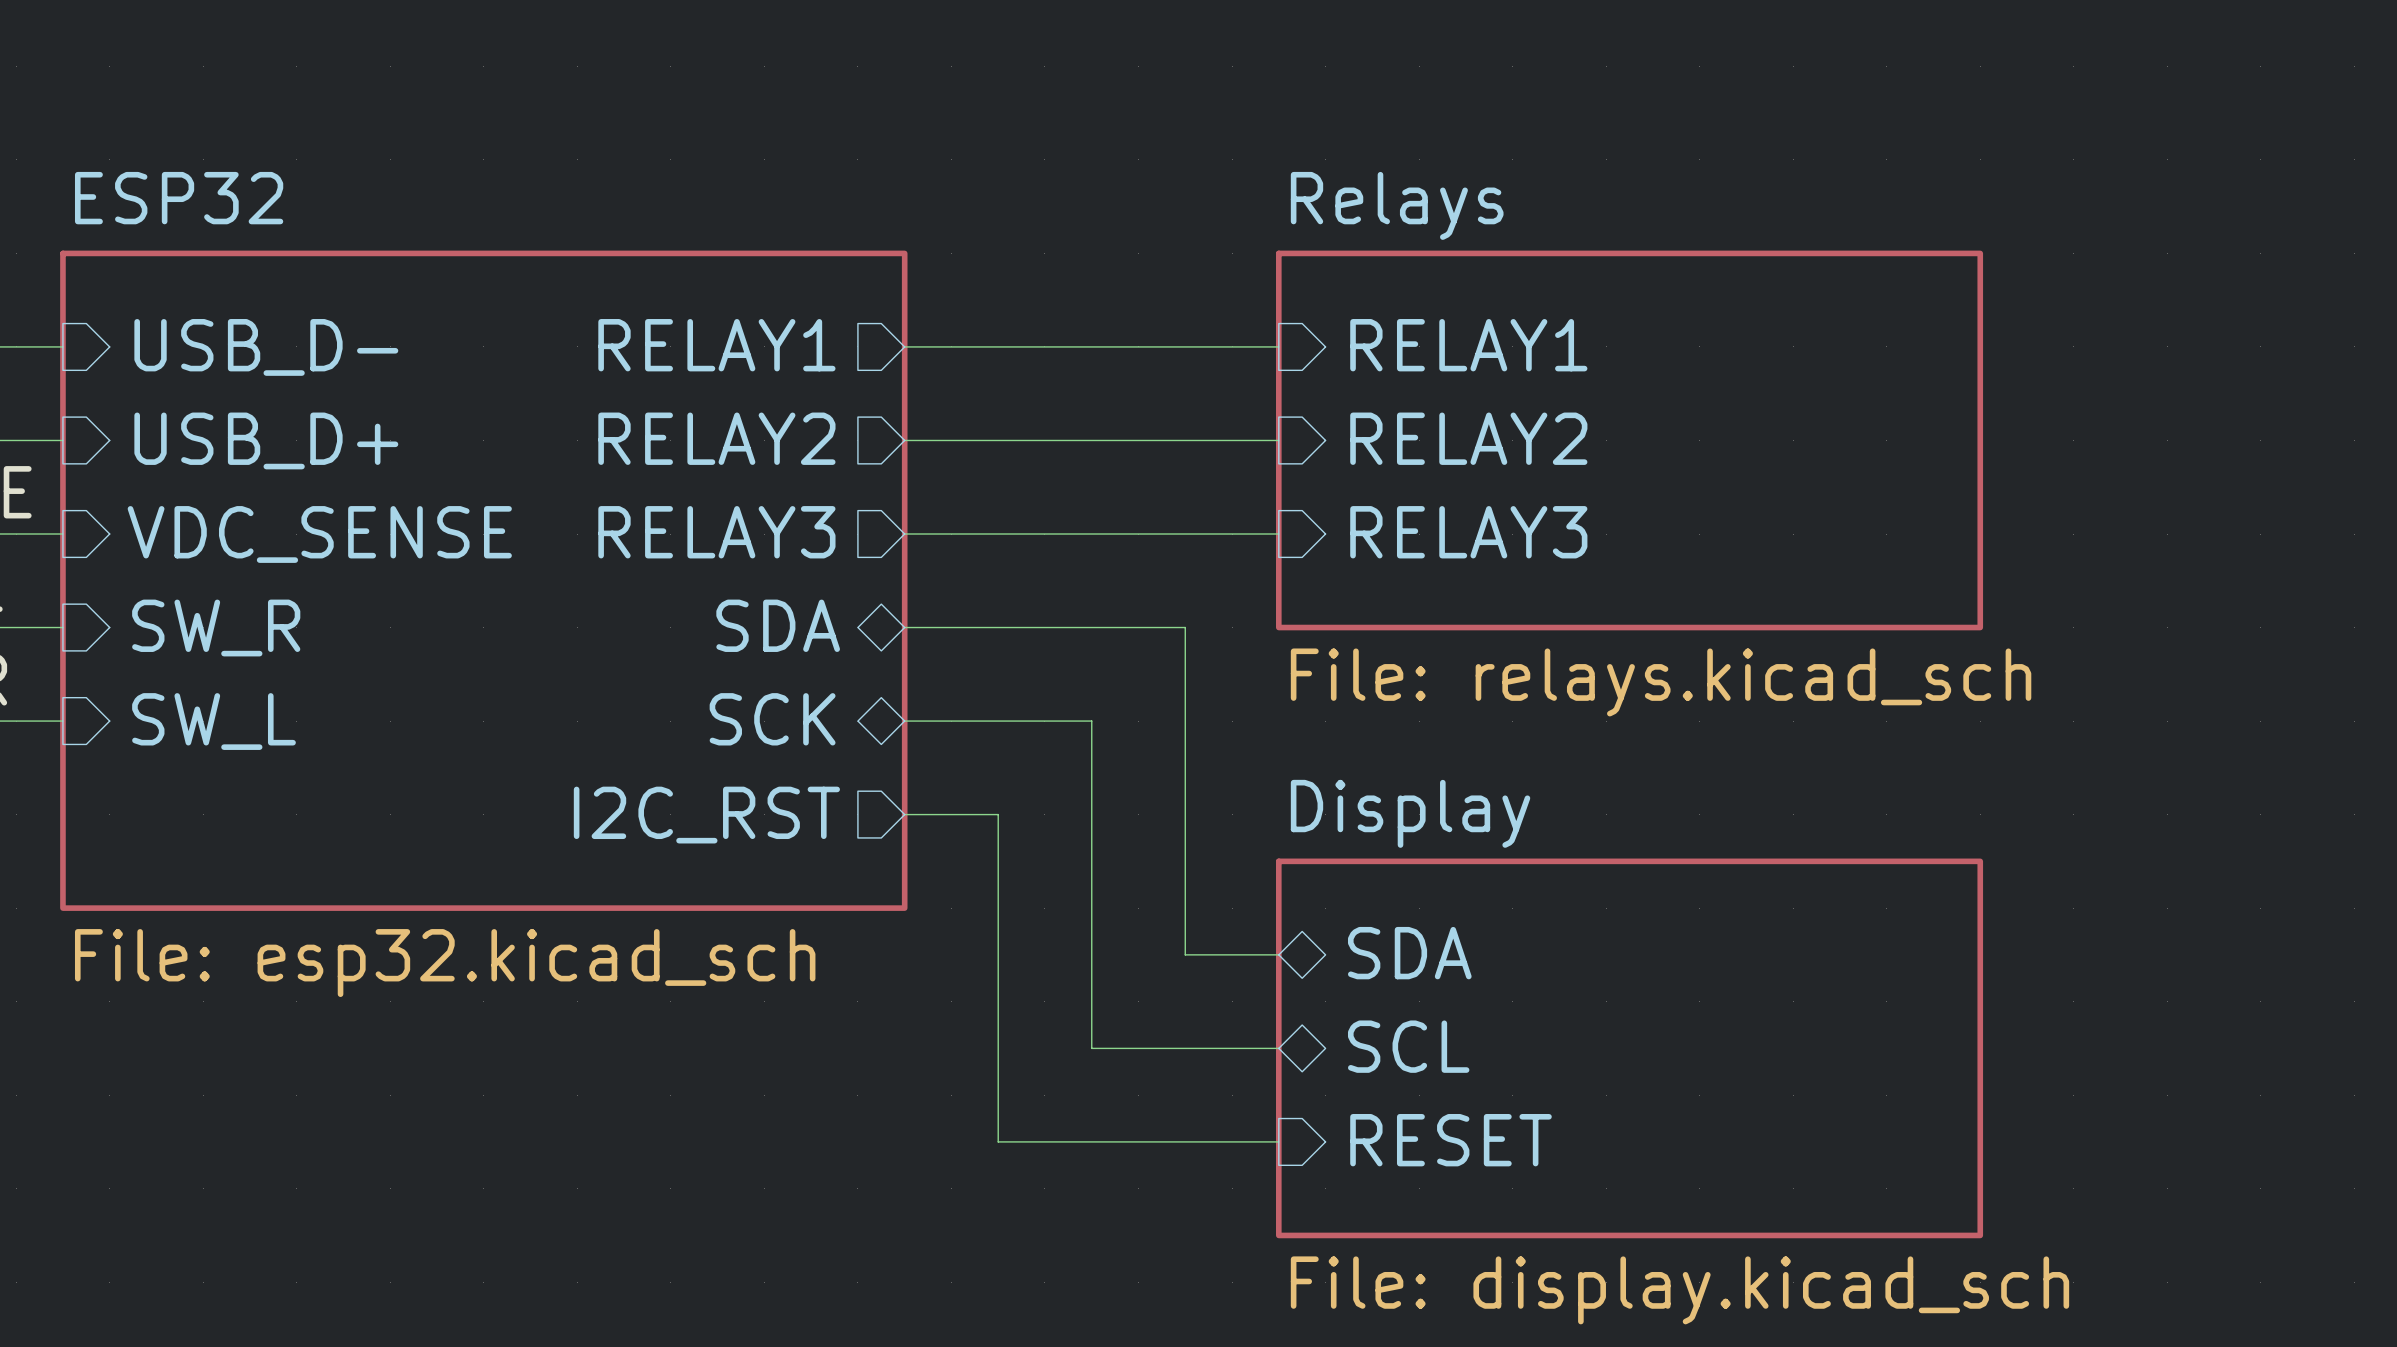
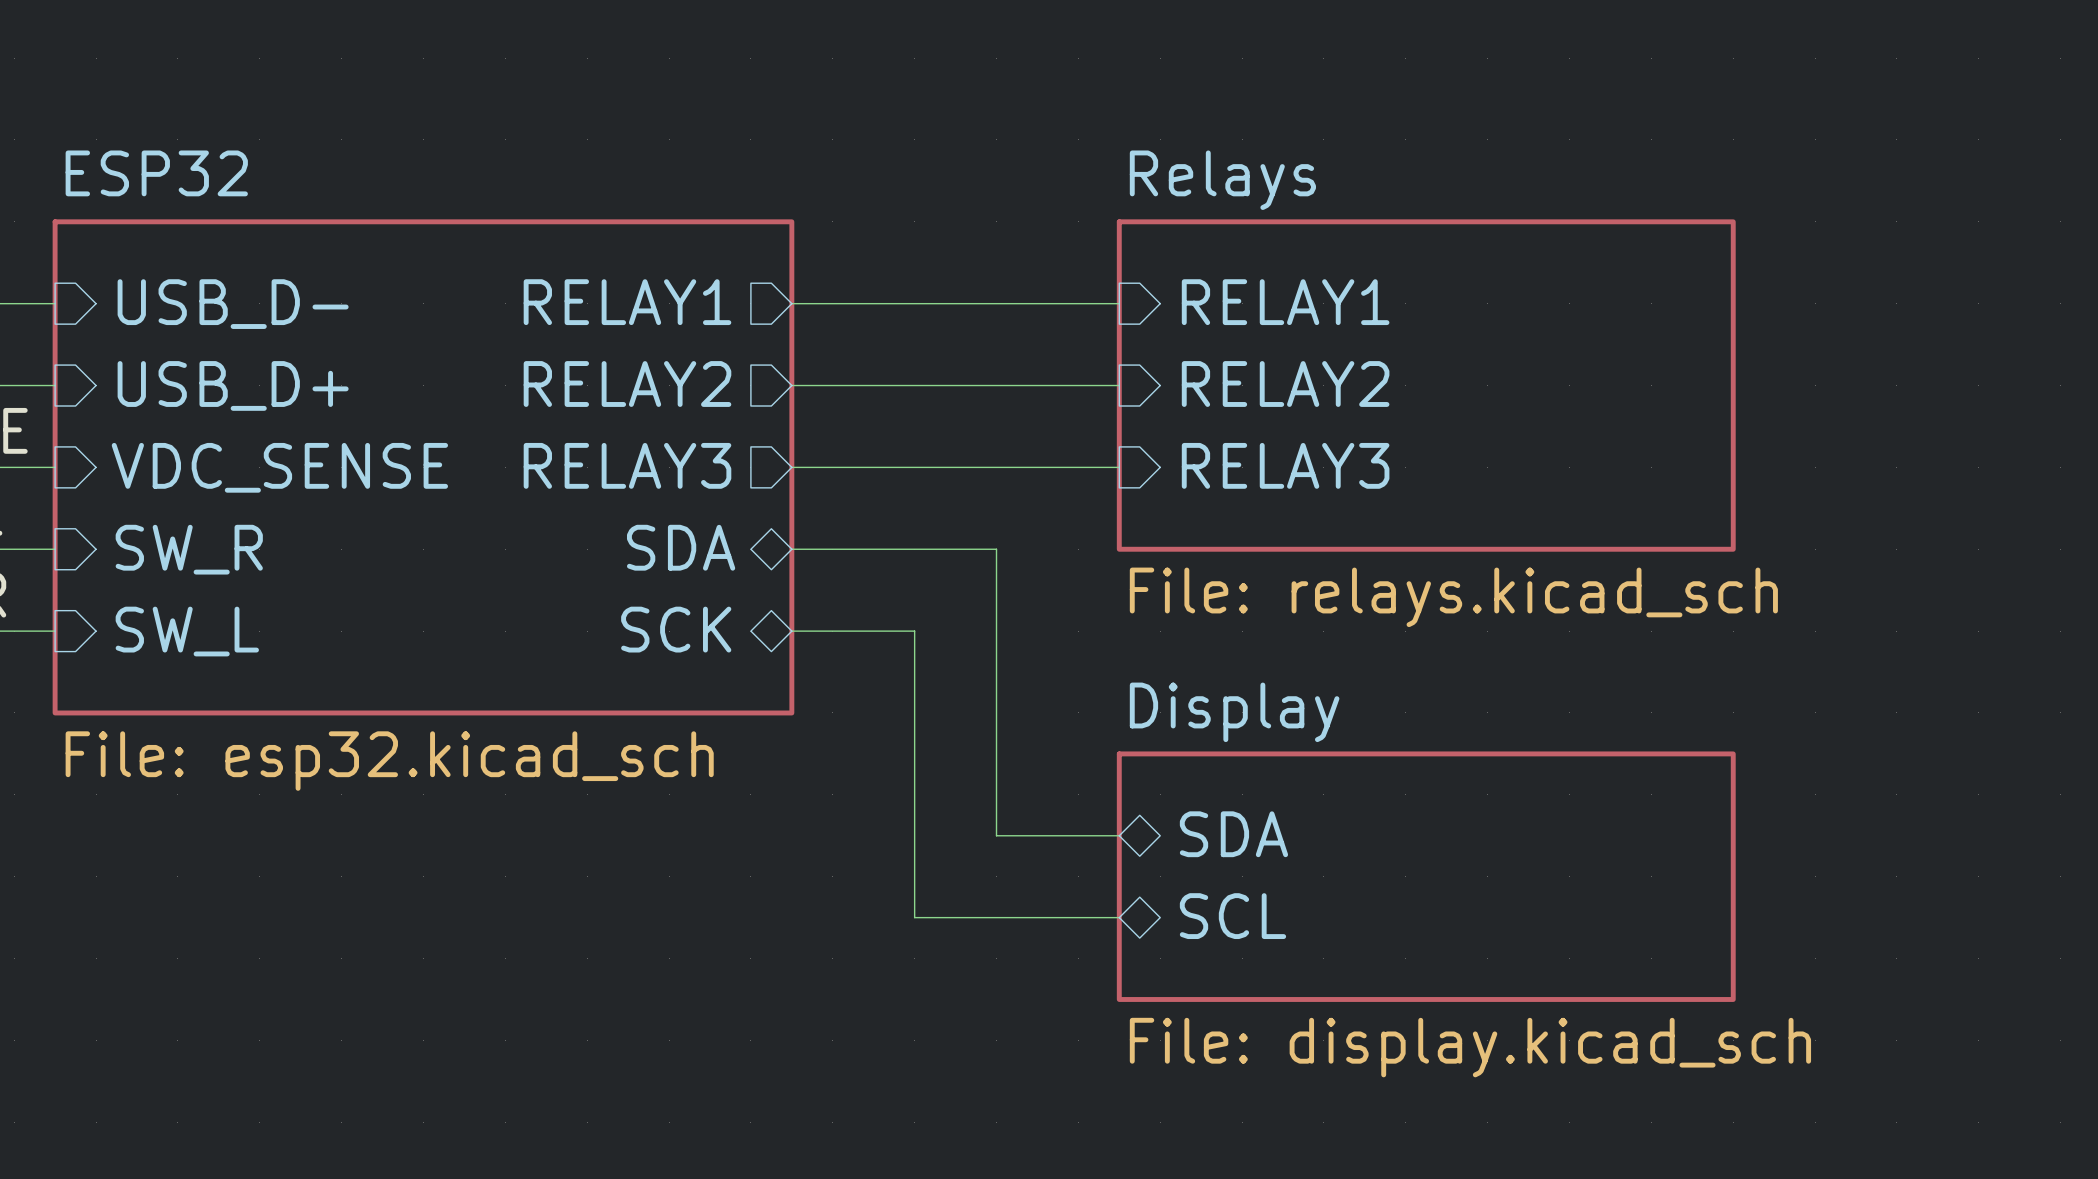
sheet ESP32 shape: [60, 250, 908, 911] -> [52, 219, 795, 716]
wire: (1138, 627) (1185, 627) (1185, 954) -> (996, 549) (996, 835) (1037, 835)
wire: (1044, 721) (1091, 721) (1091, 1048) -> (914, 631) (914, 917) (955, 917)
wire: (904, 814) (998, 814) (998, 1141) (1278, 1141) -> none
sheet pin: I2C_RST (706, 815) -> none
sheet Display: none -> File: display.kicad_sch (1426, 876)
sheet Display: File: display.kicad_sch (1629, 1048) -> none
sheet pin: RESET (1451, 1140) -> none

